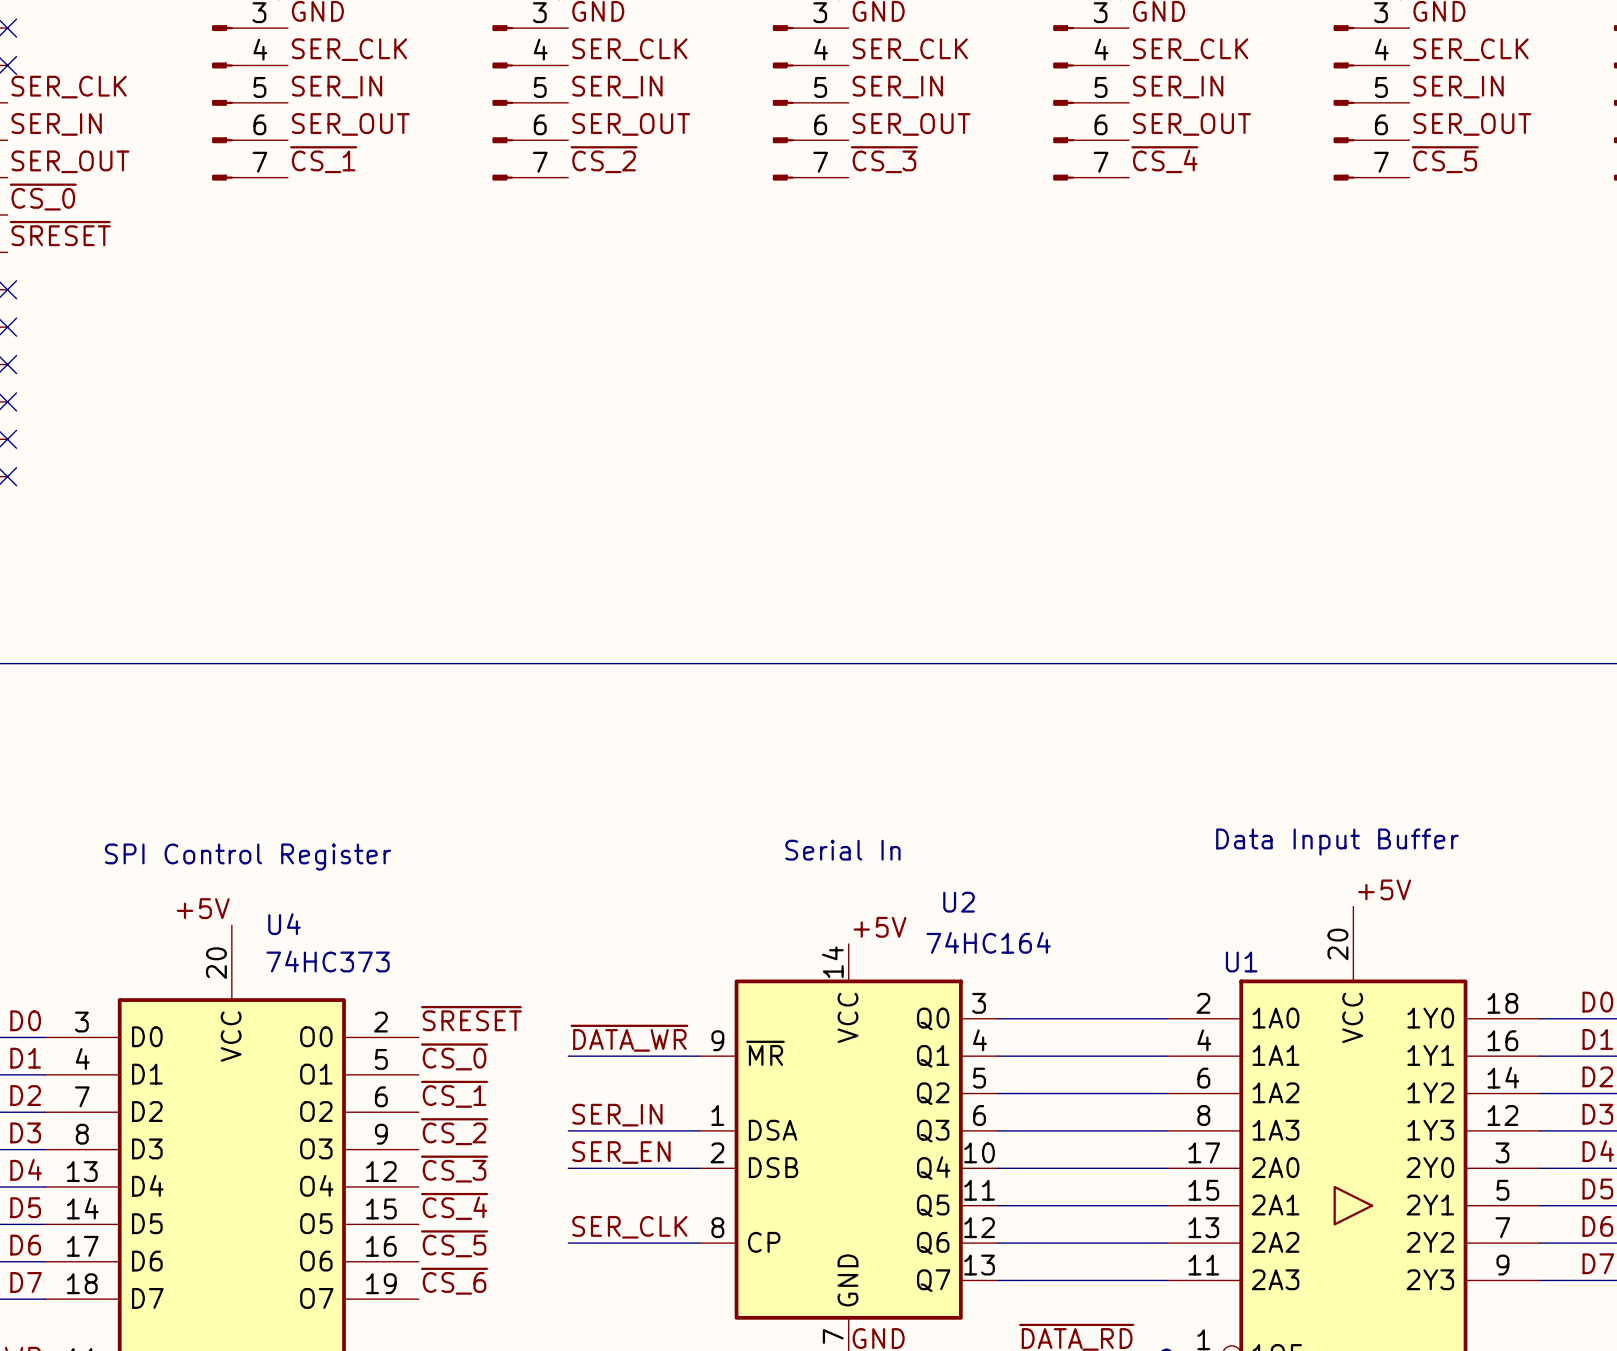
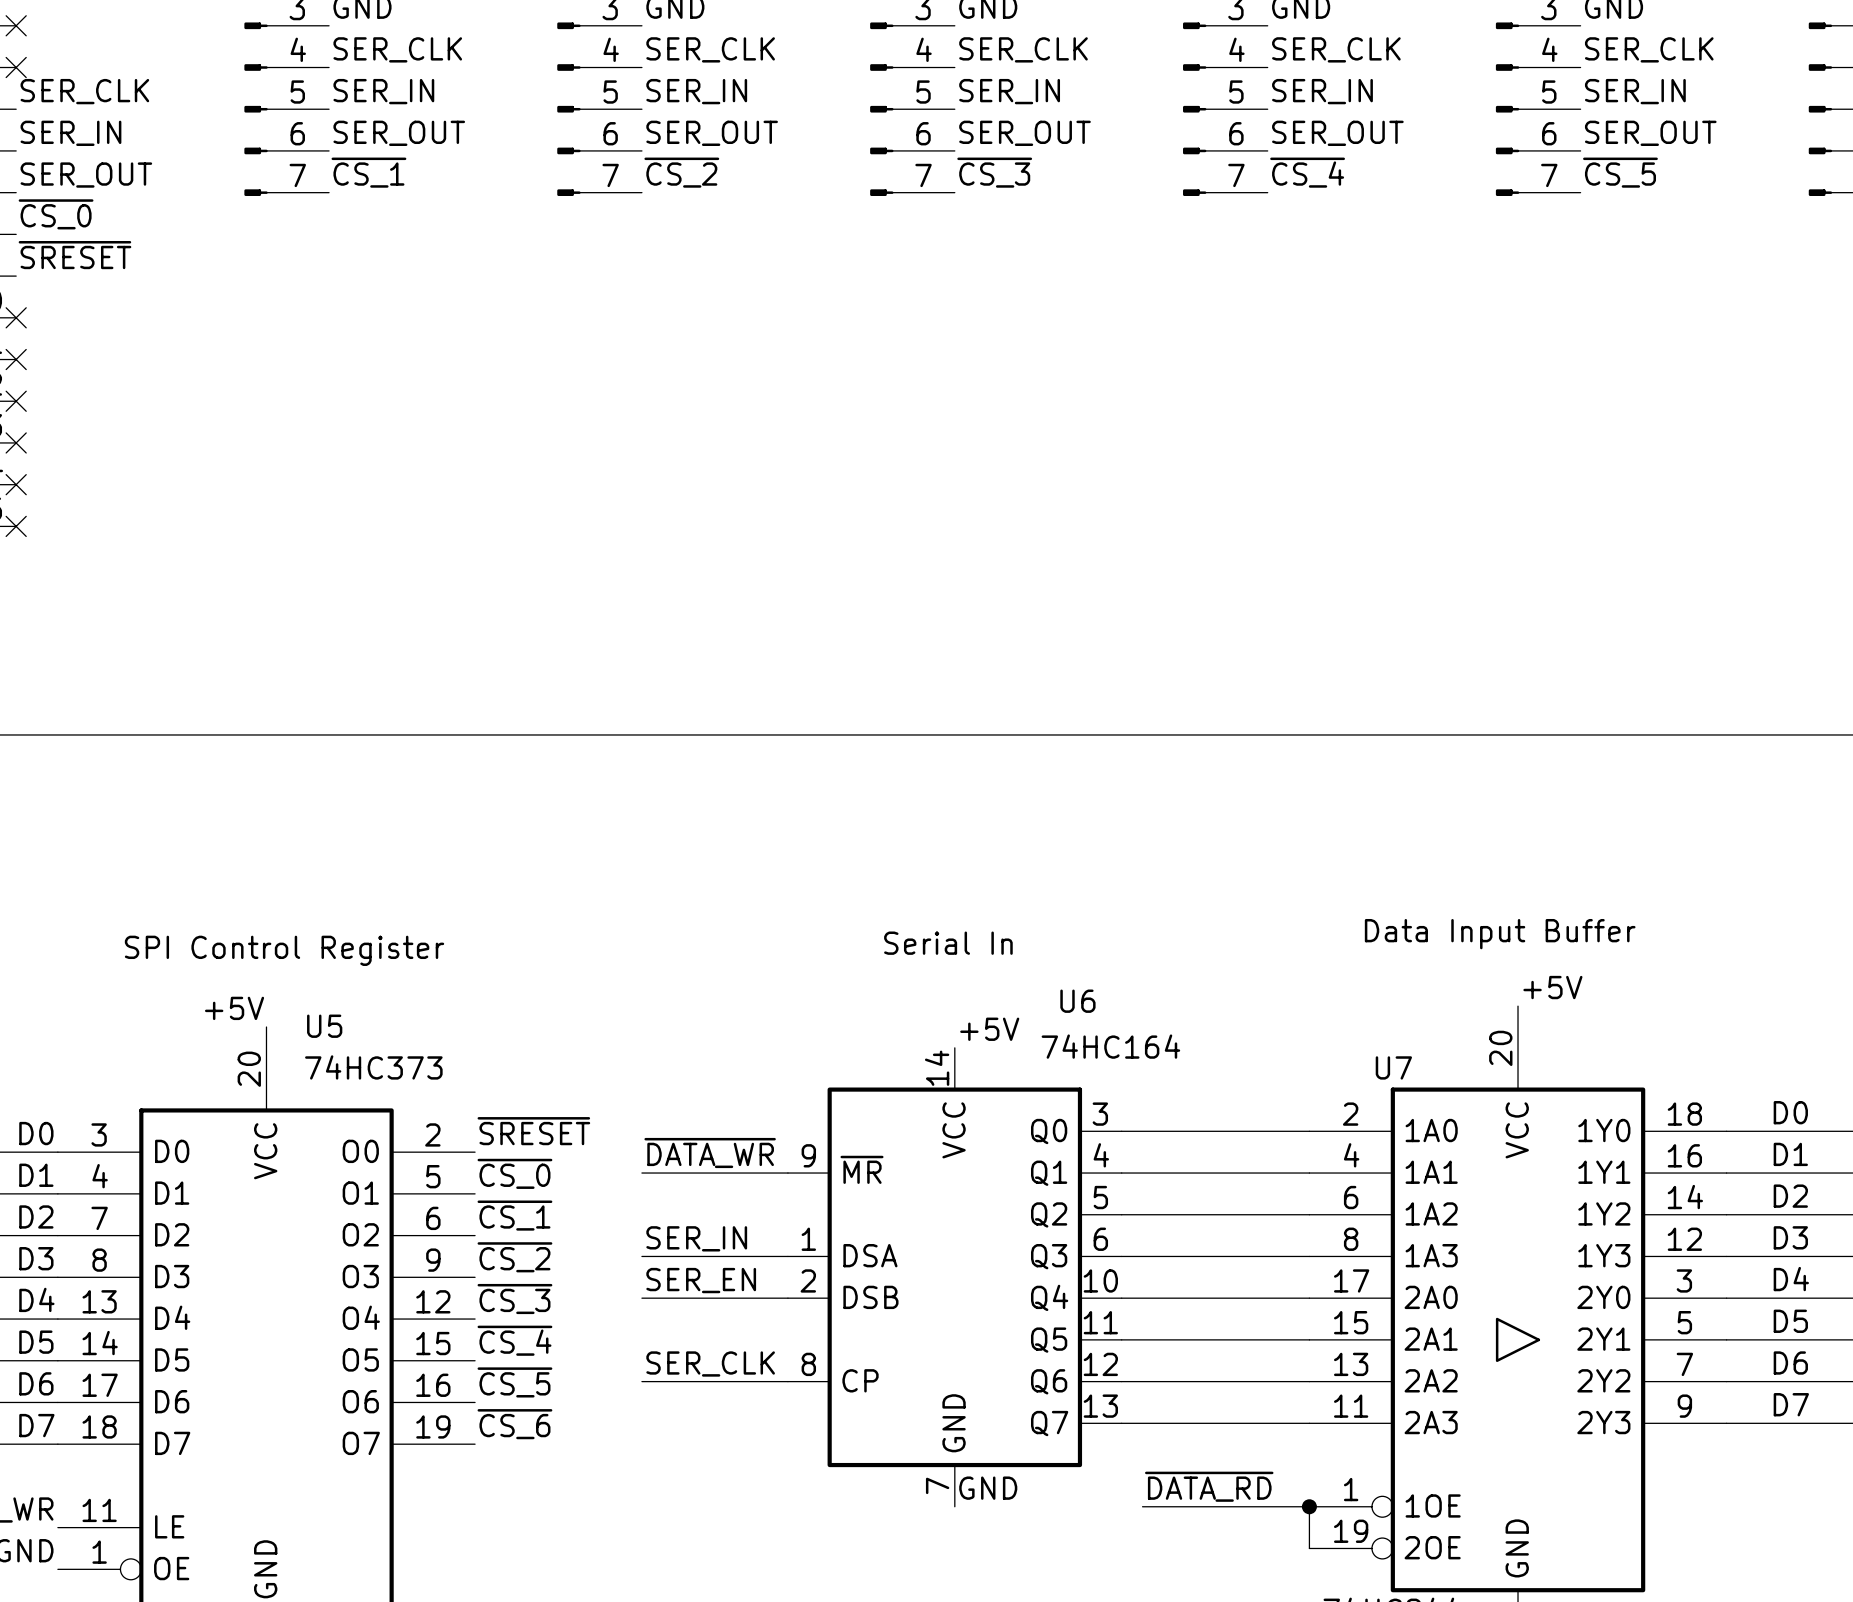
U2 name: U2 (959, 902) -> U6 (1077, 1001)
U4 name: U4 (284, 924) -> U5 (324, 1026)
U1 name: U1 (1241, 961) -> U7 (1393, 1067)

